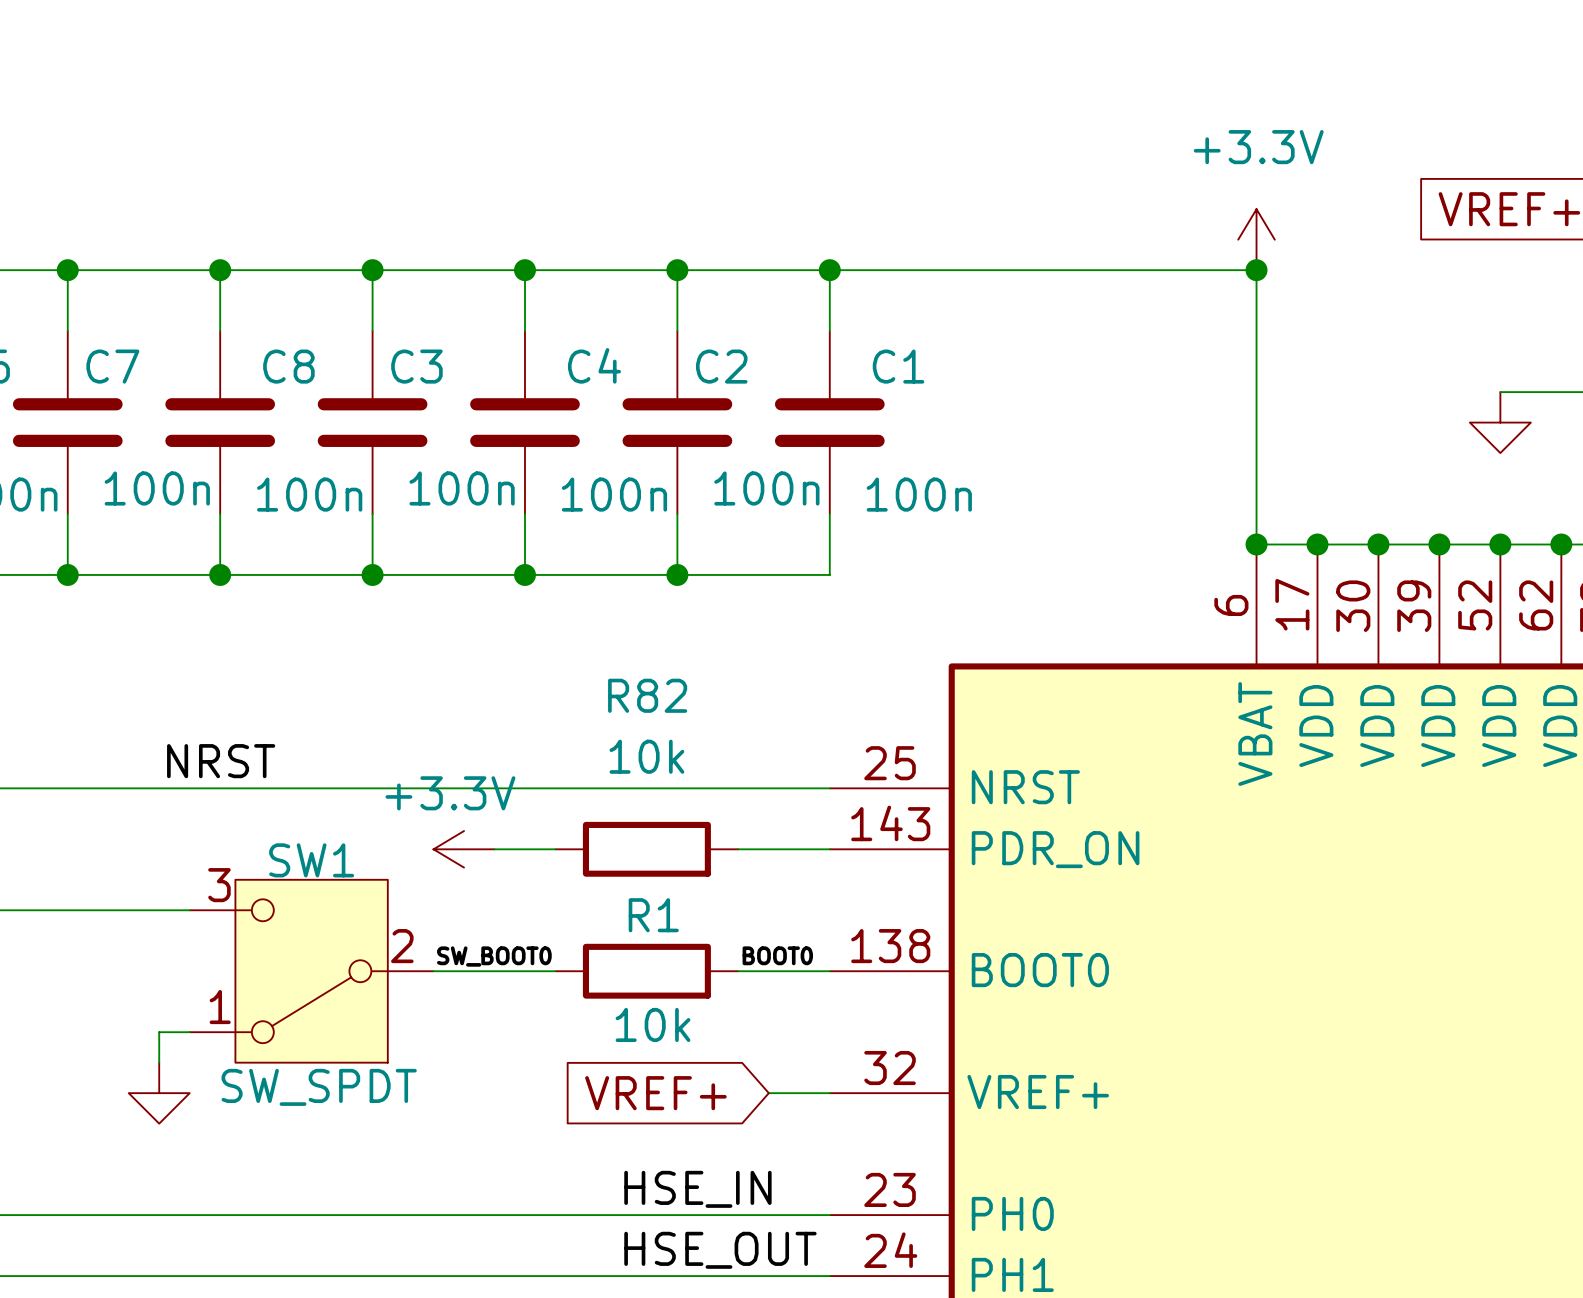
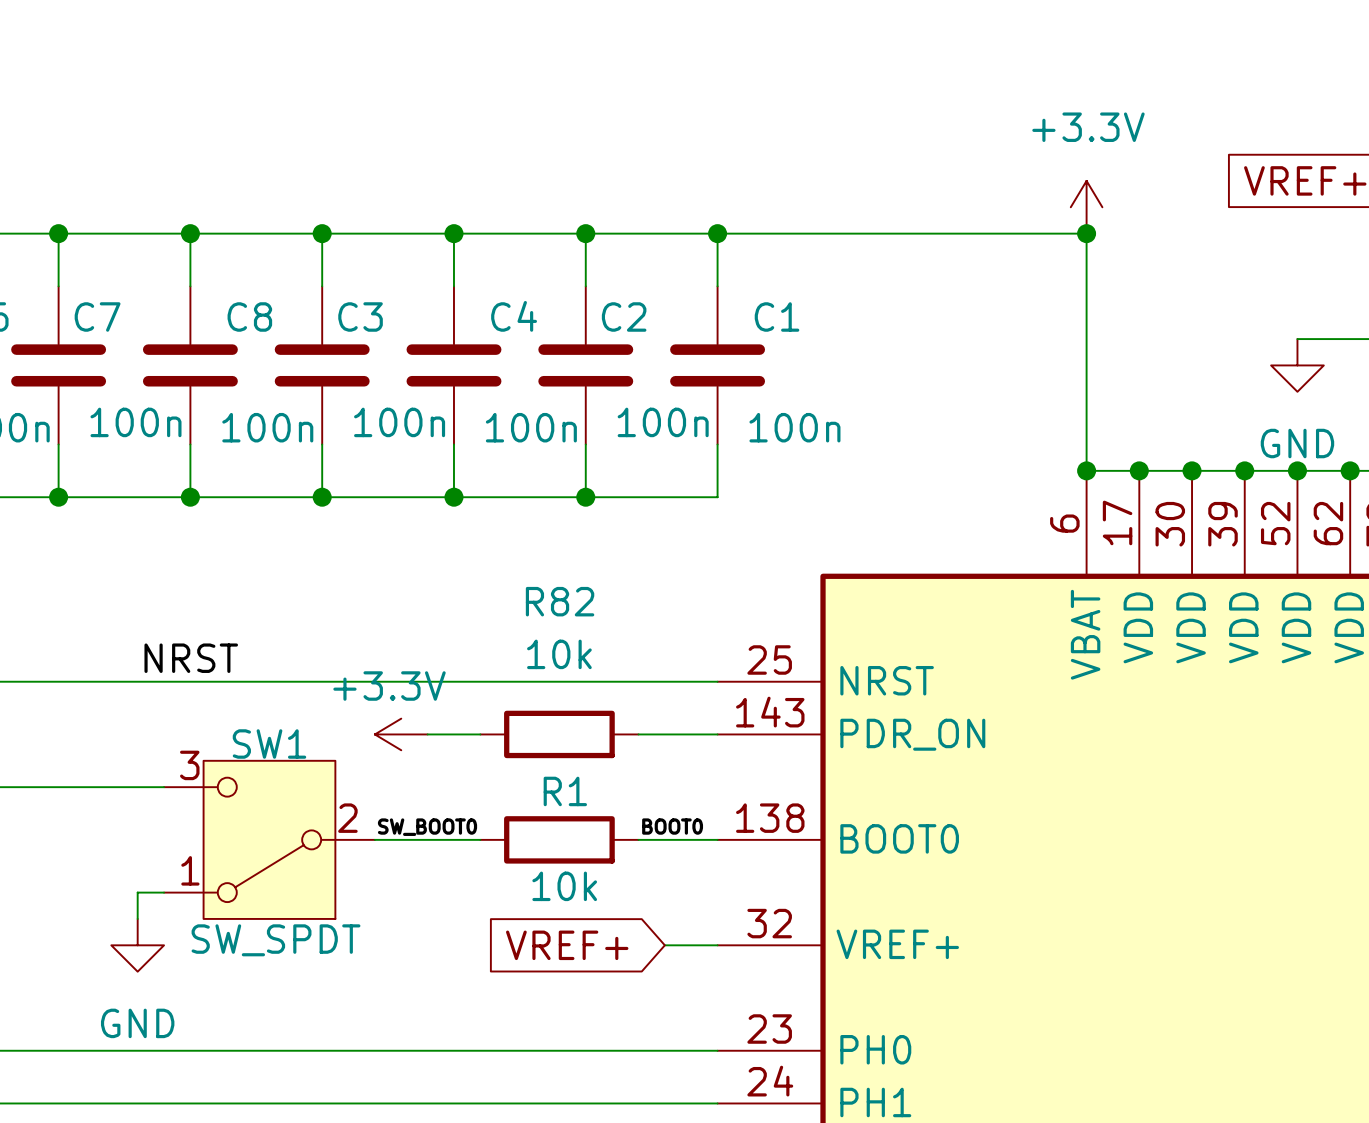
power symbol text: none -> GND (1297, 443)
power symbol text: none -> GND (137, 1023)
label: HSE_IN (697, 1189) -> none
label: HSE_OUT (720, 1250) -> none

